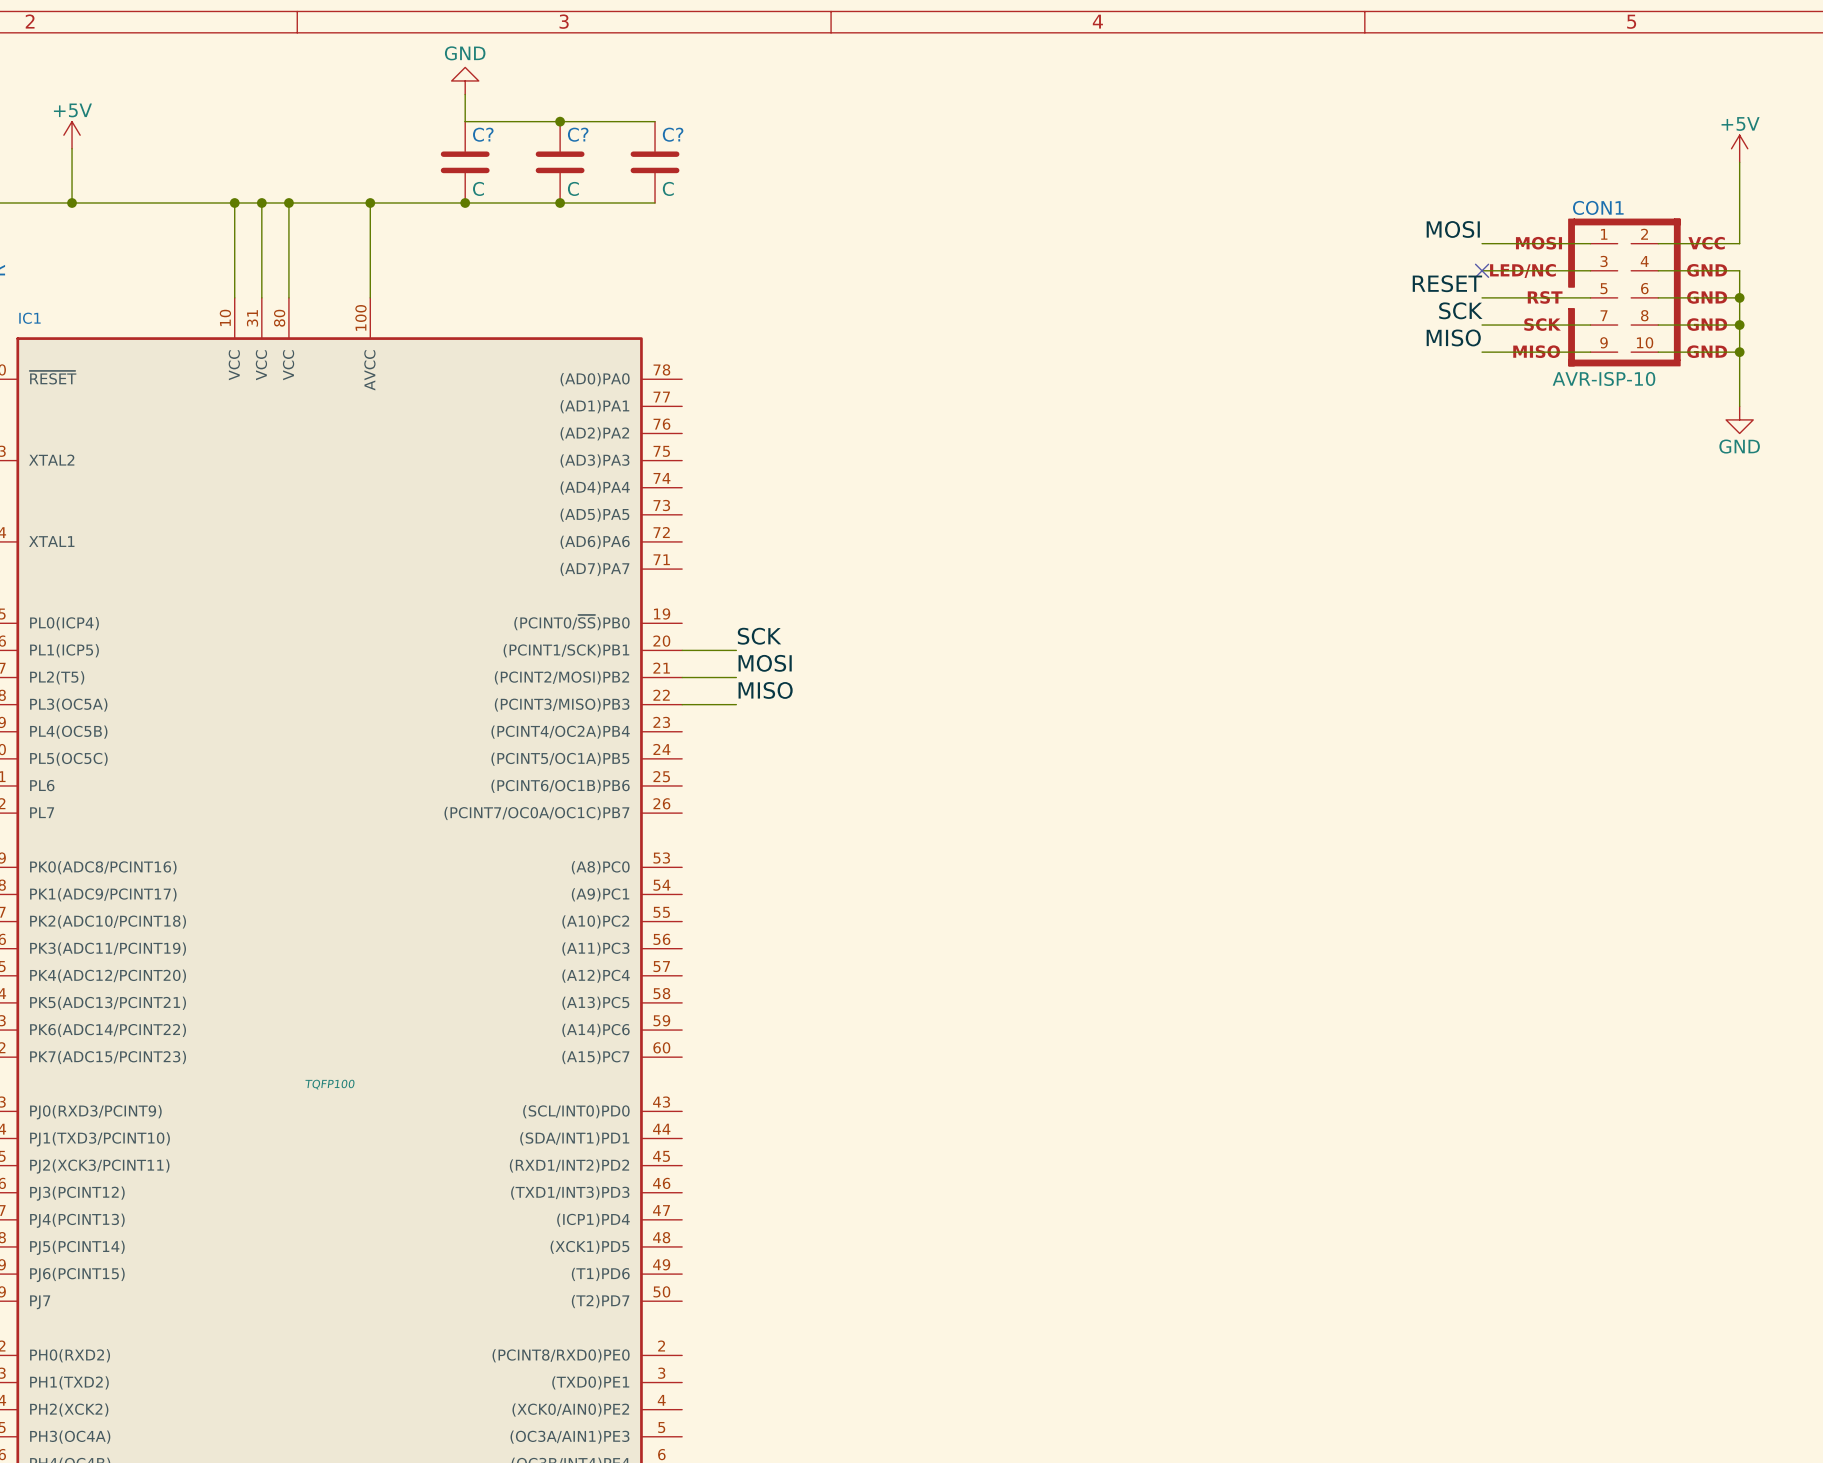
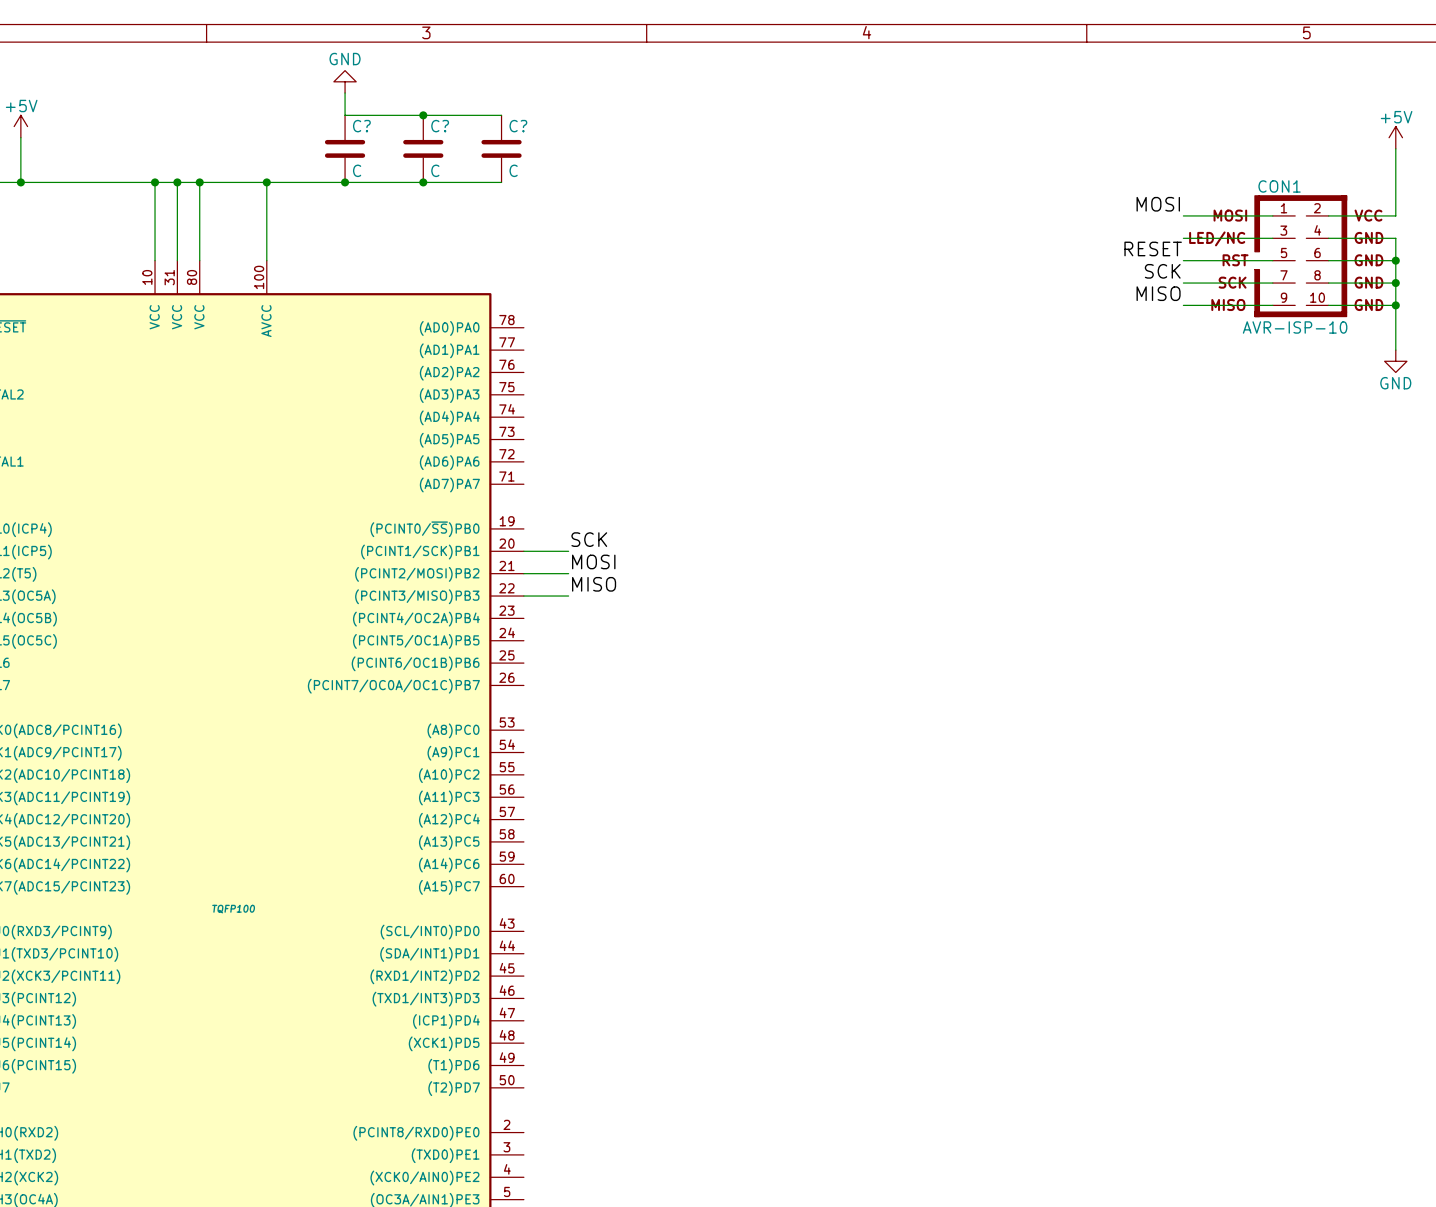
no-connect mark: (1482, 270) -> none

